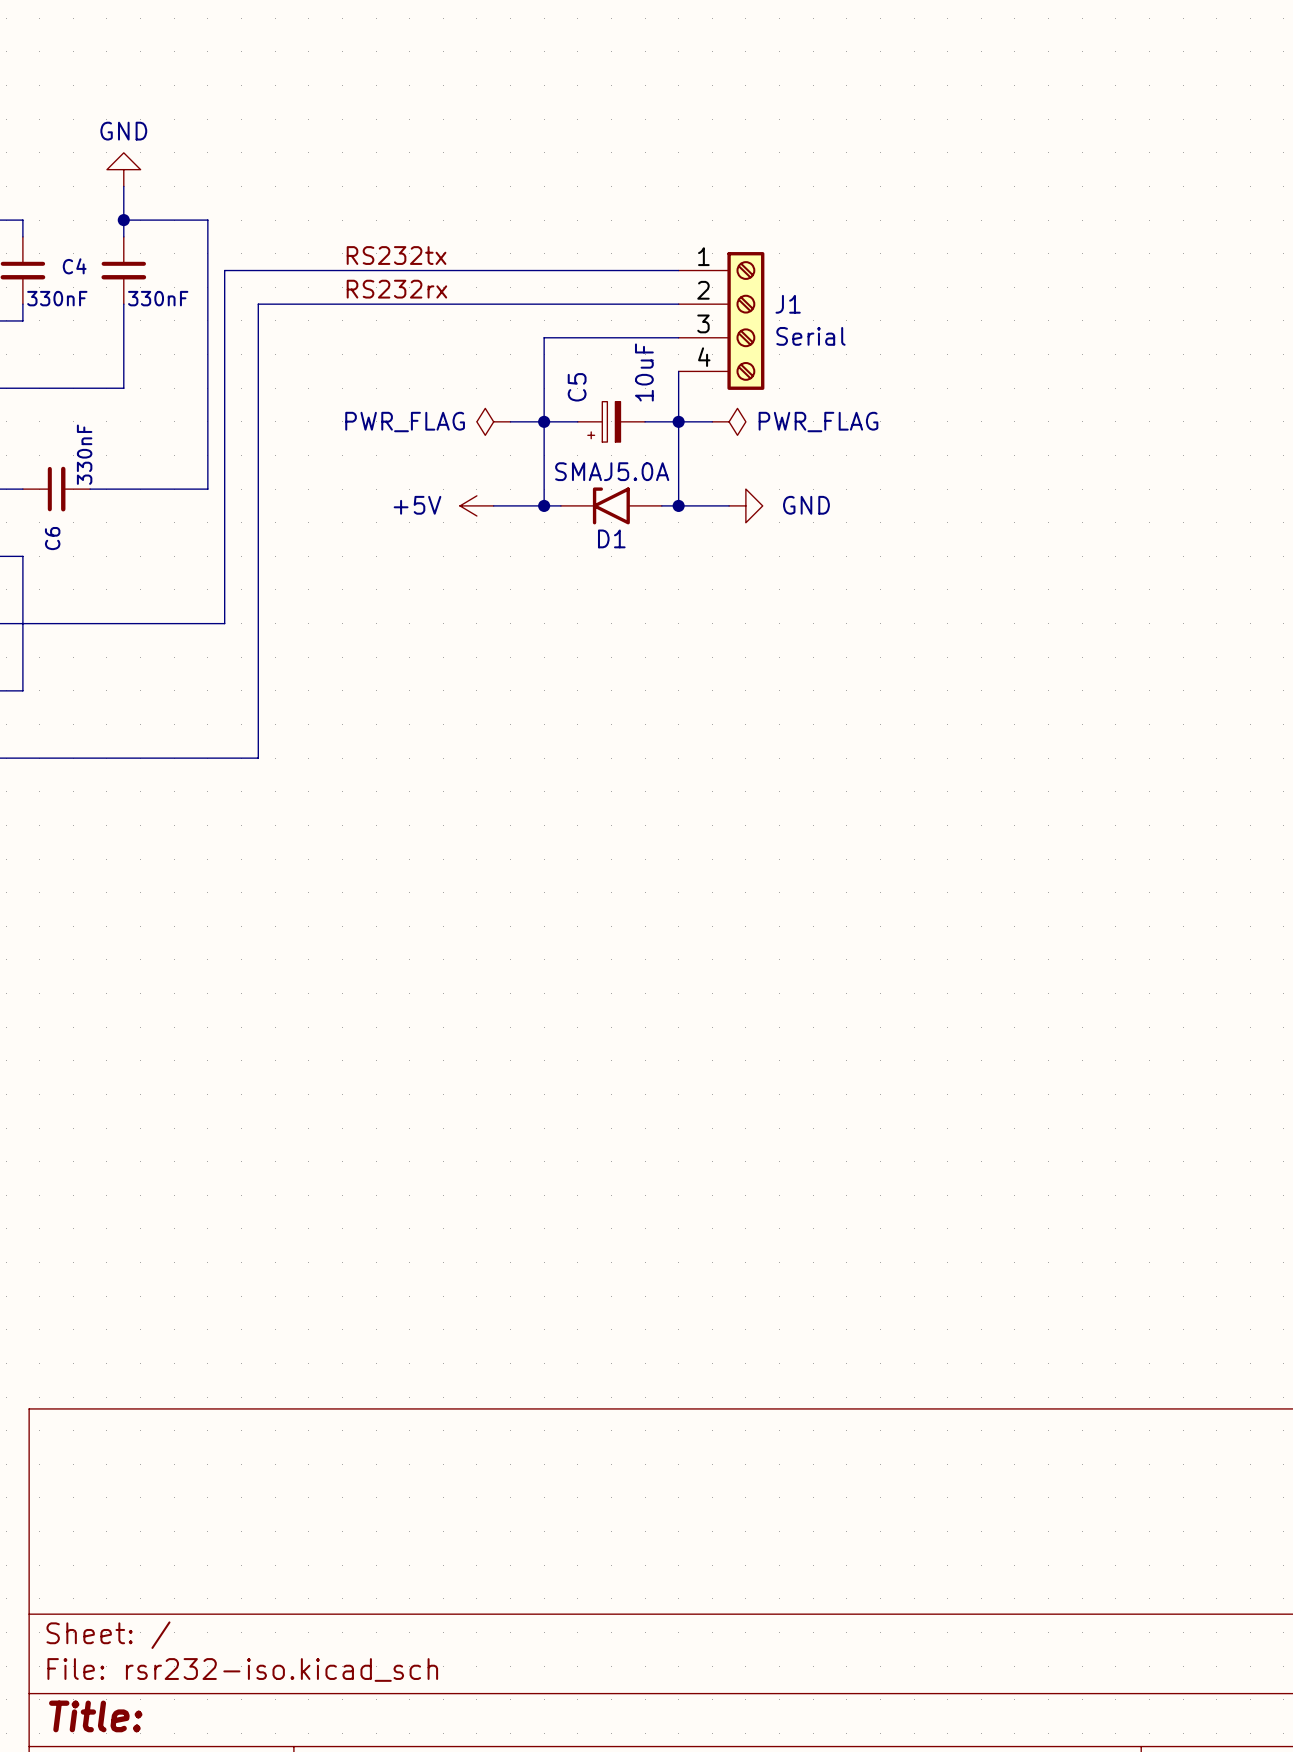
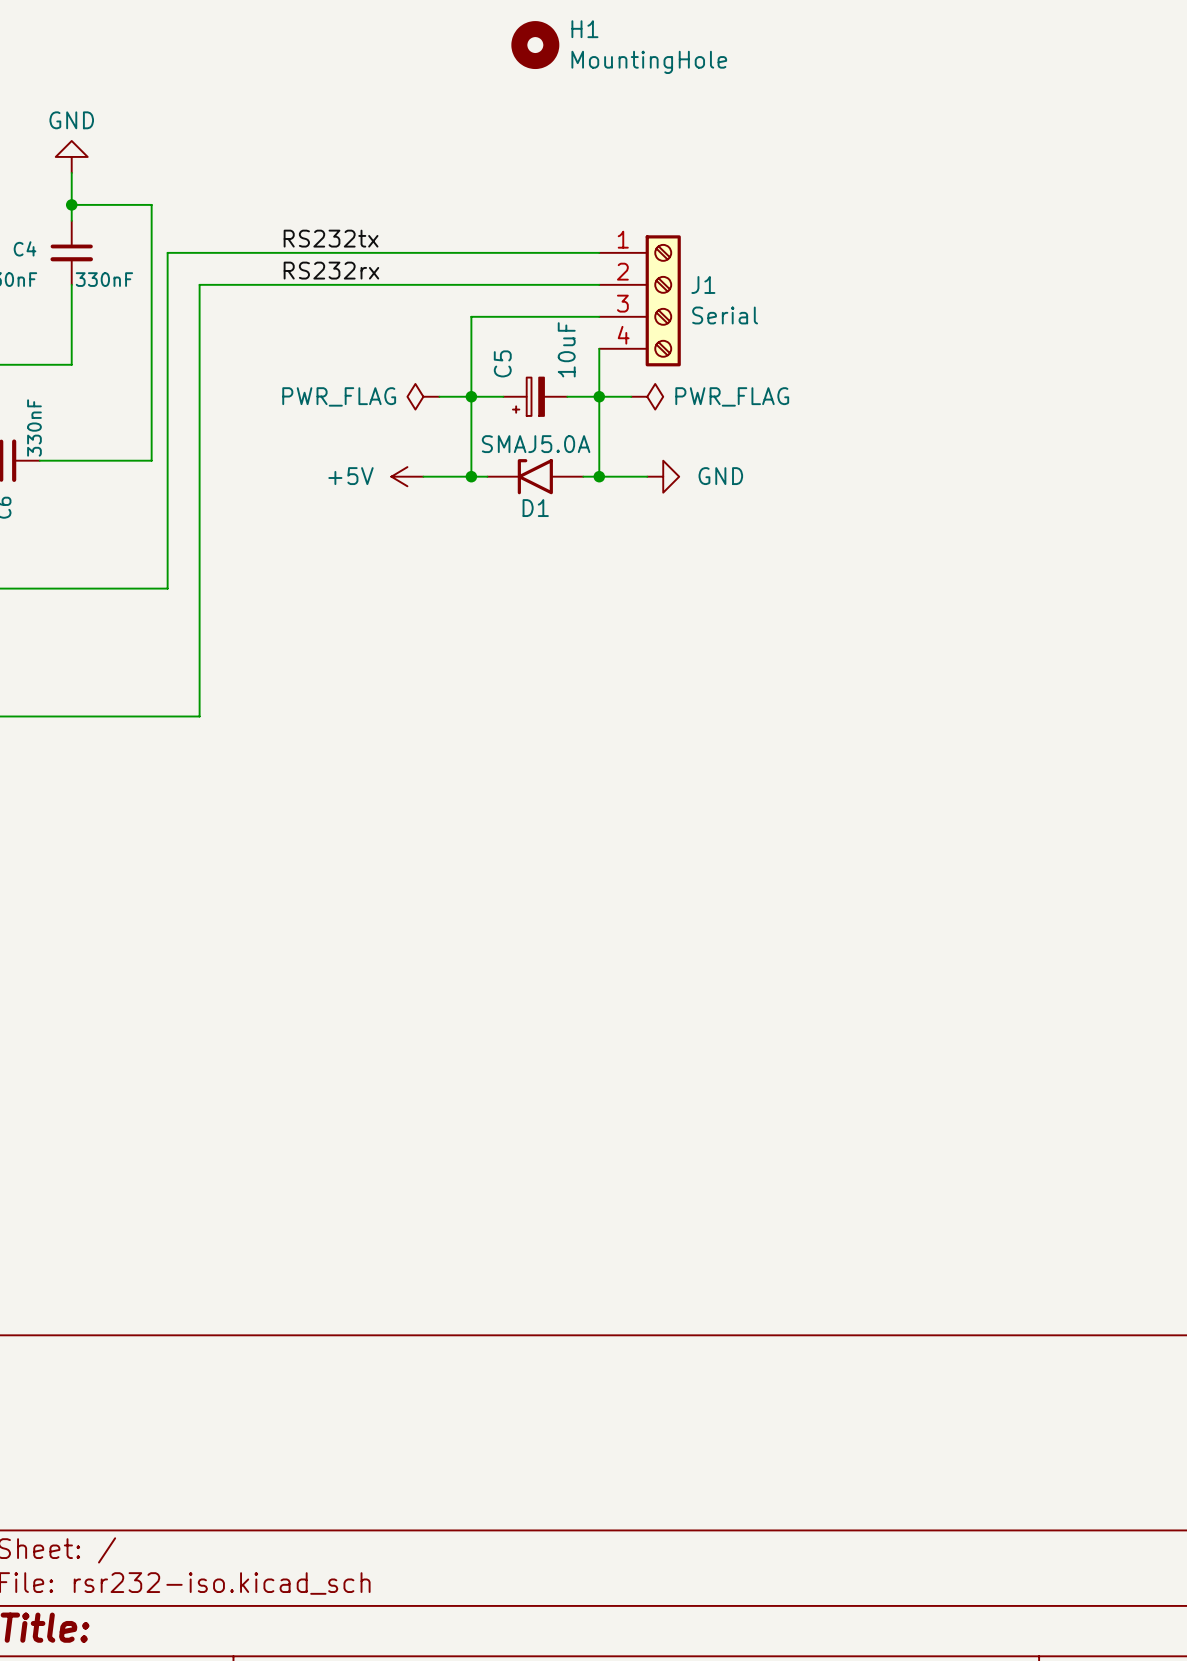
H1: none -> MountingHole (535, 45)

